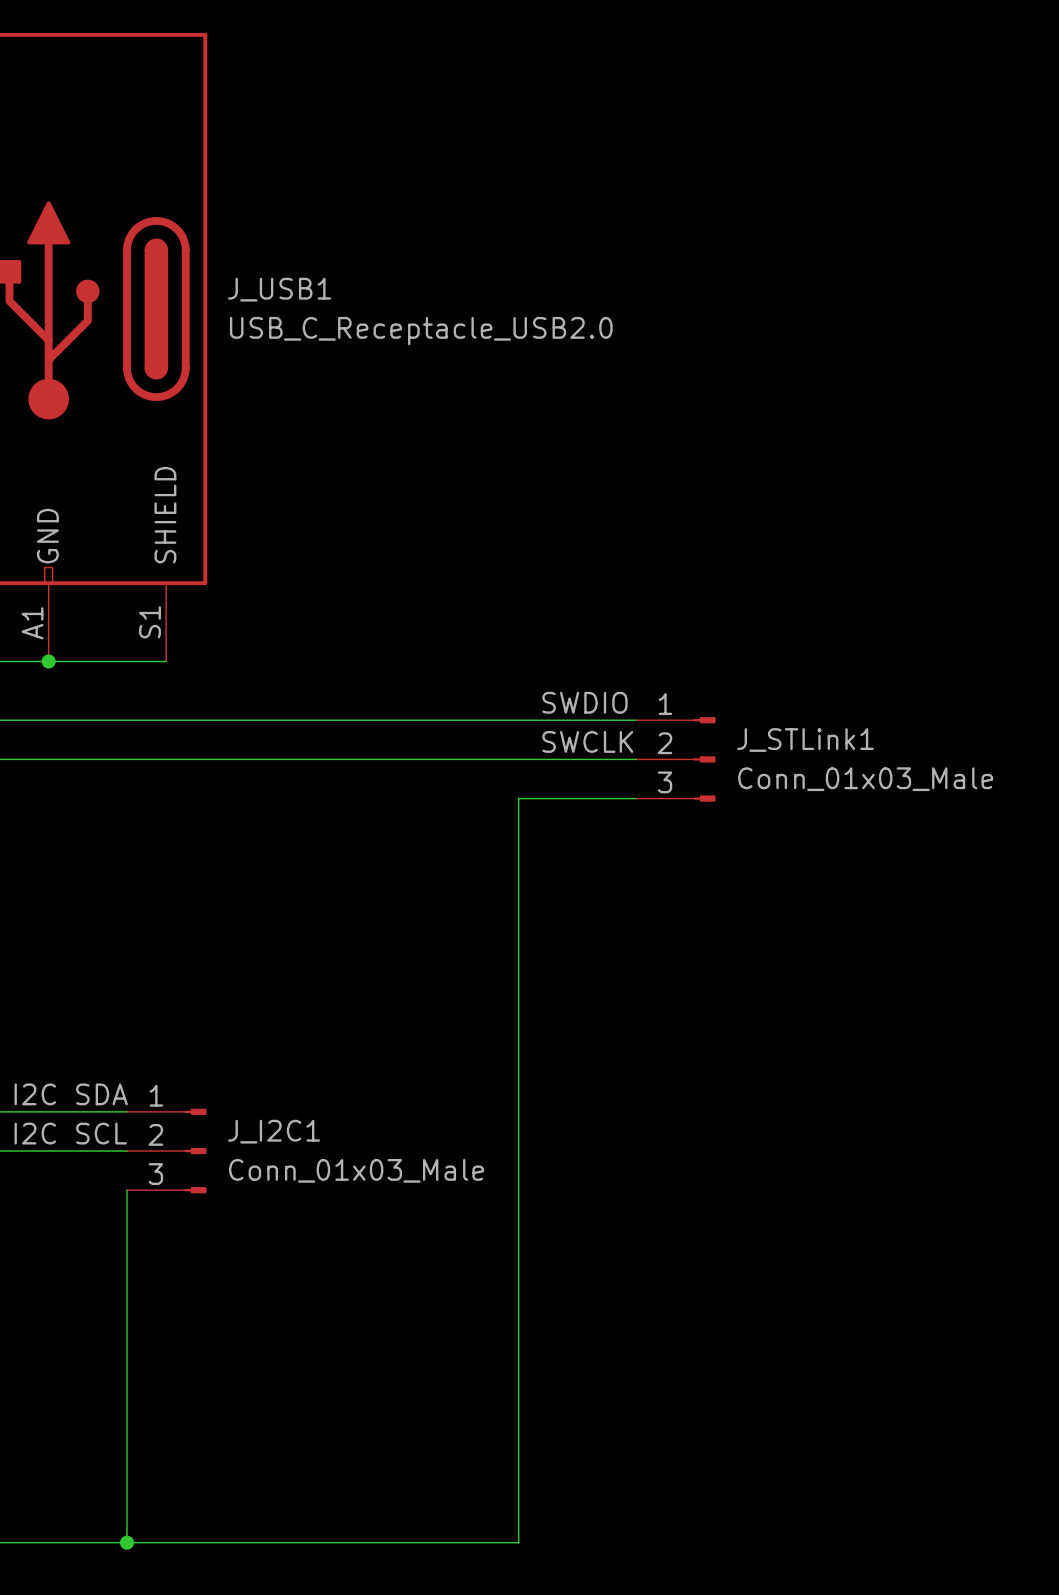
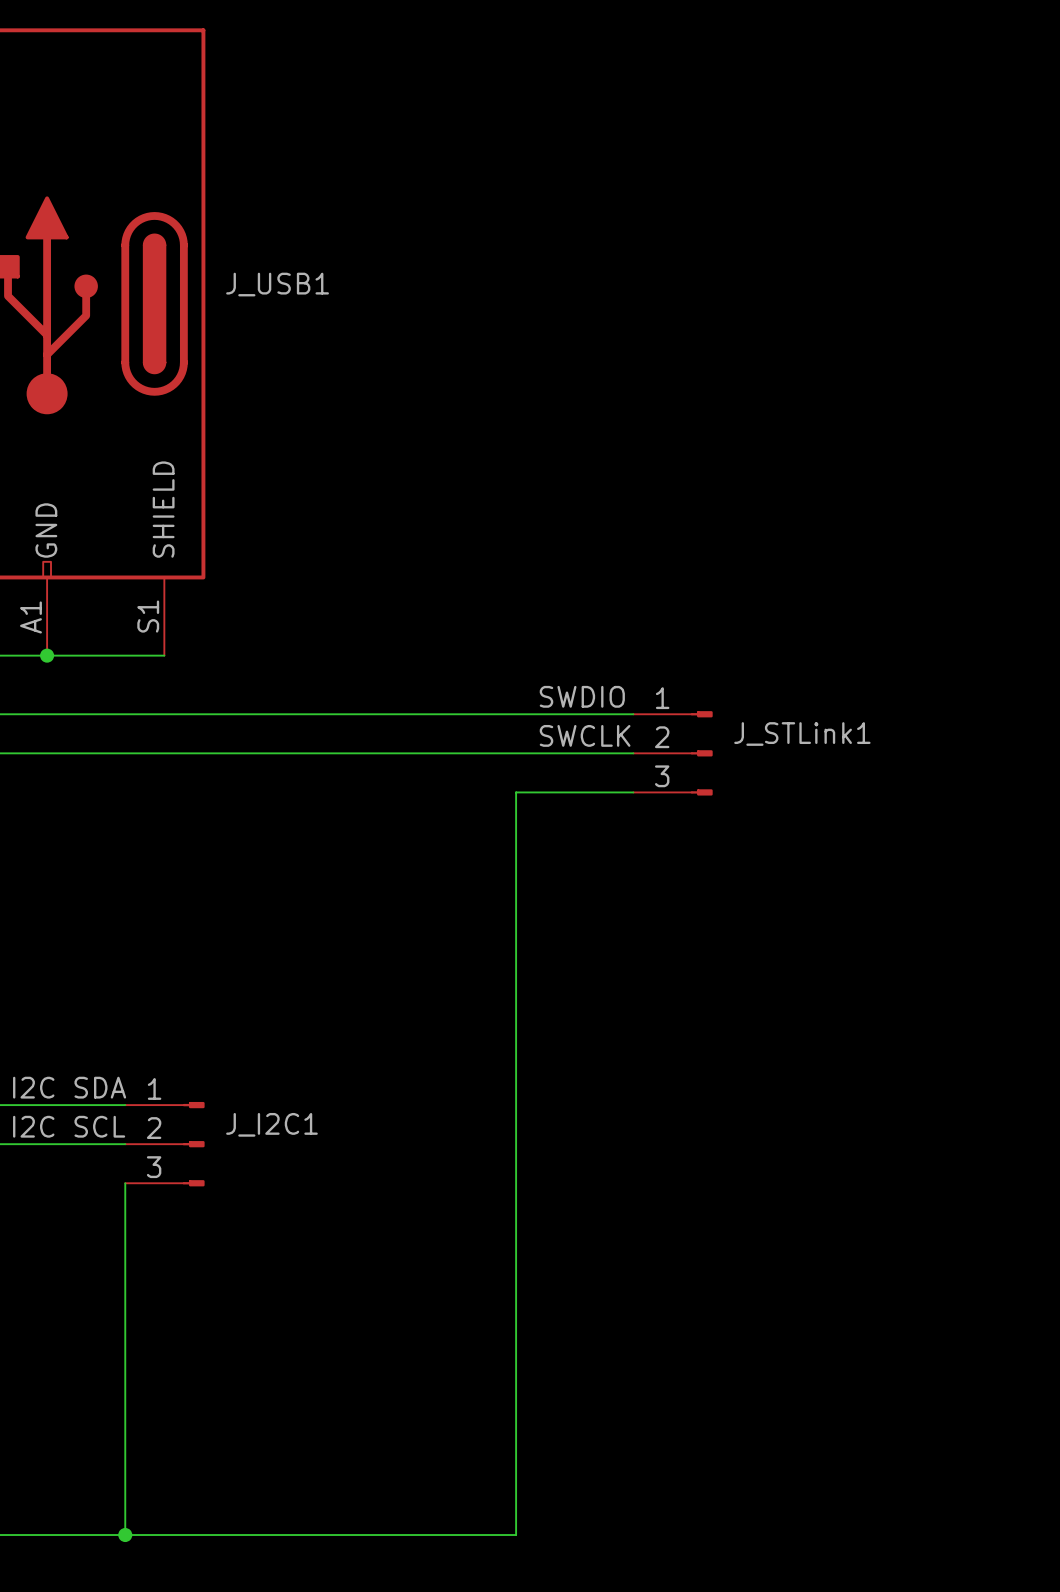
J_USB1 value: USB_C_Receptacle_USB2.0 (421, 331) -> none
J_STLink1 value: Conn_01x03_Male (865, 779) -> none
J_I2C1 value: Conn_01x03_Male (356, 1170) -> none

